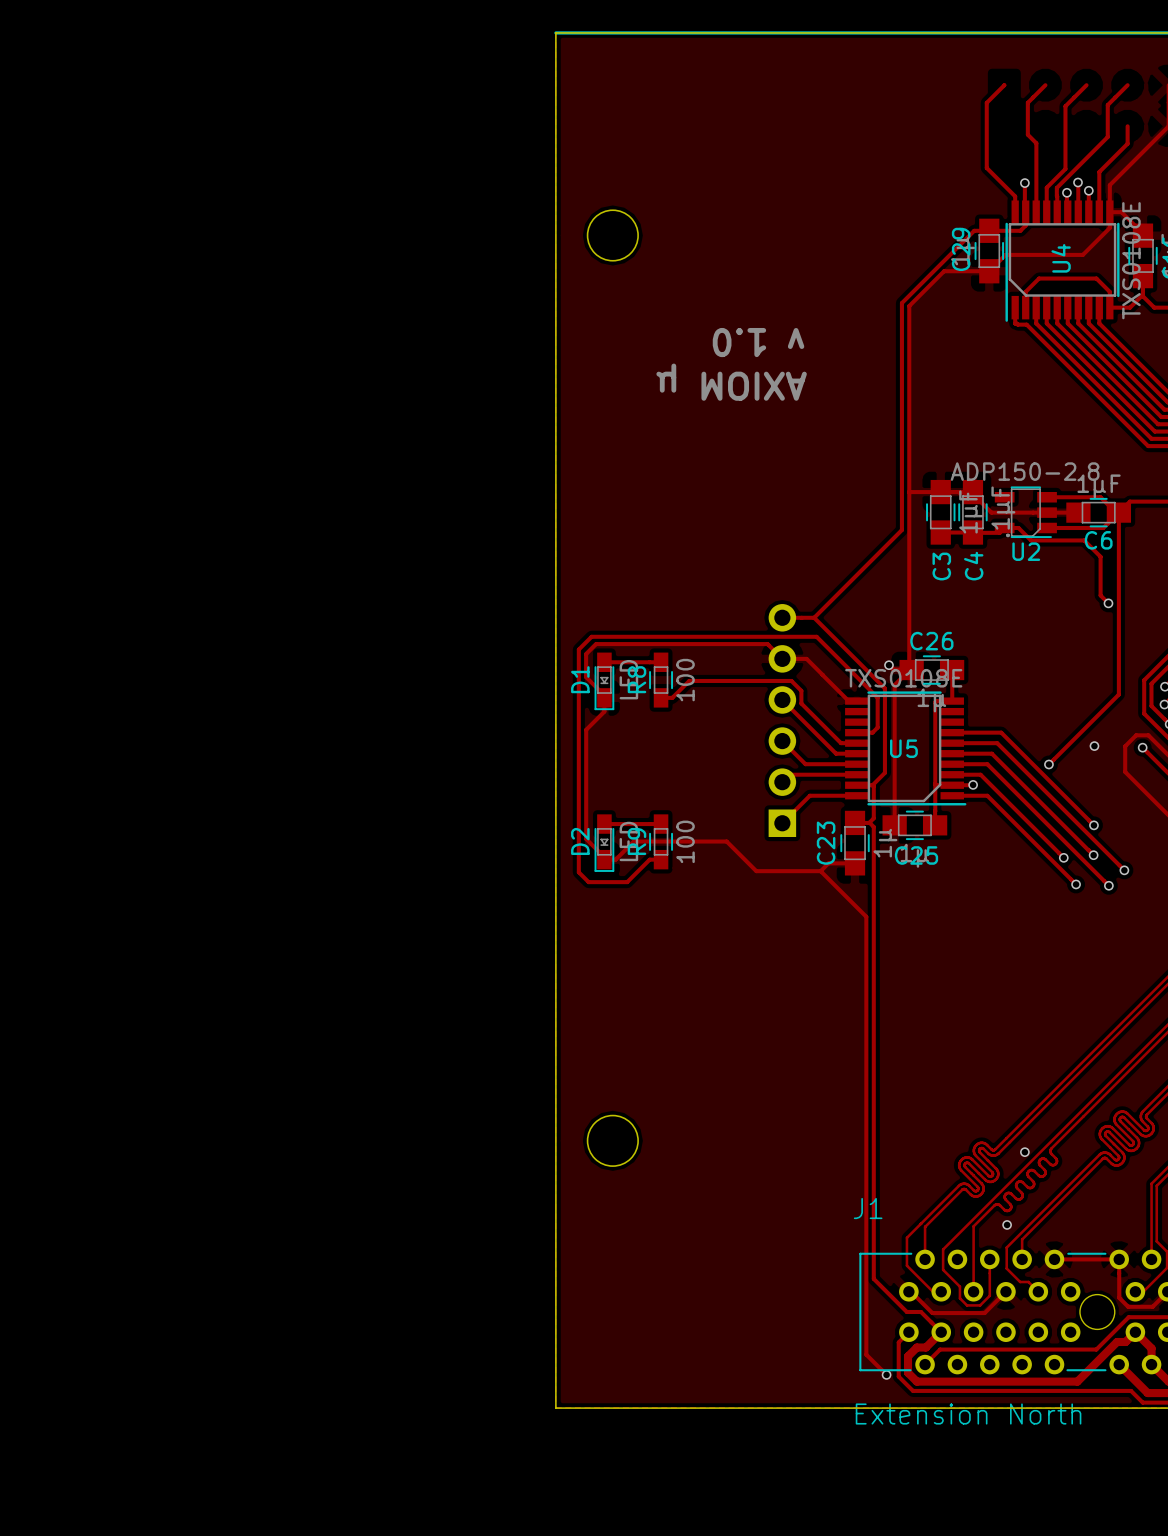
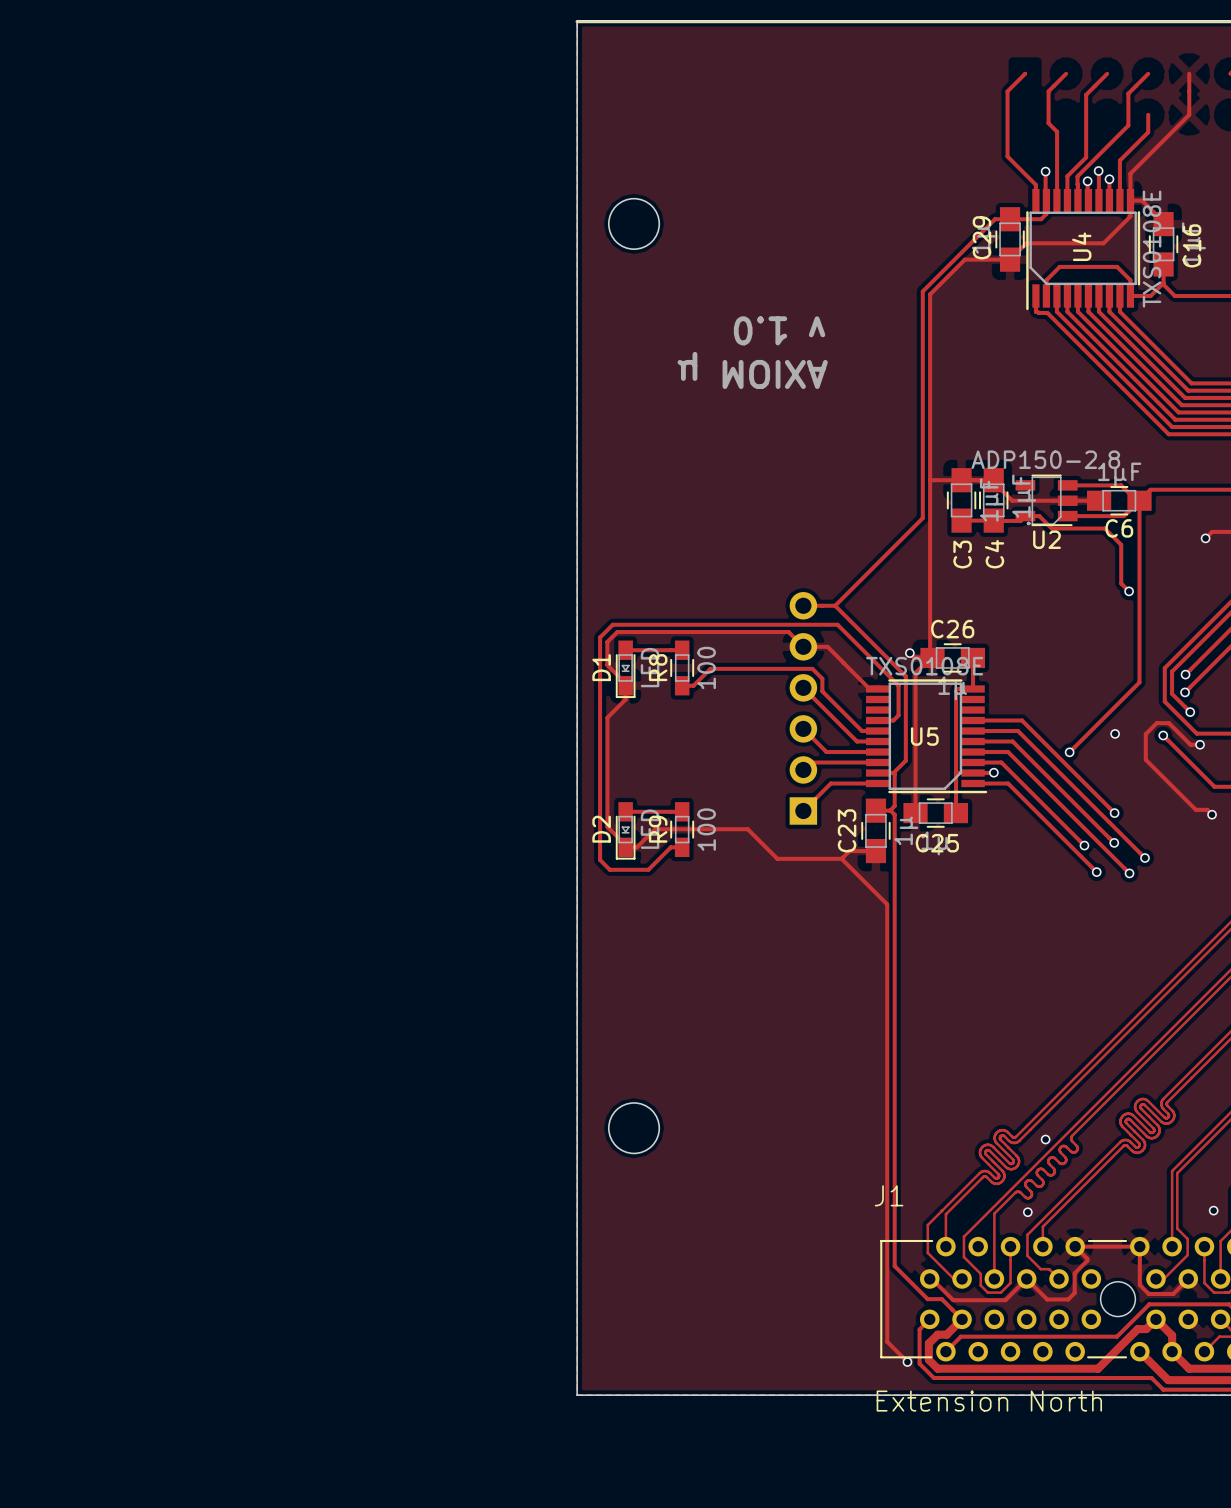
track: none -> (1075, 1246) (1087, 1260) (1074, 1273) (1074, 1293) (1068, 1299) (1047, 1299) (1026, 1278)

